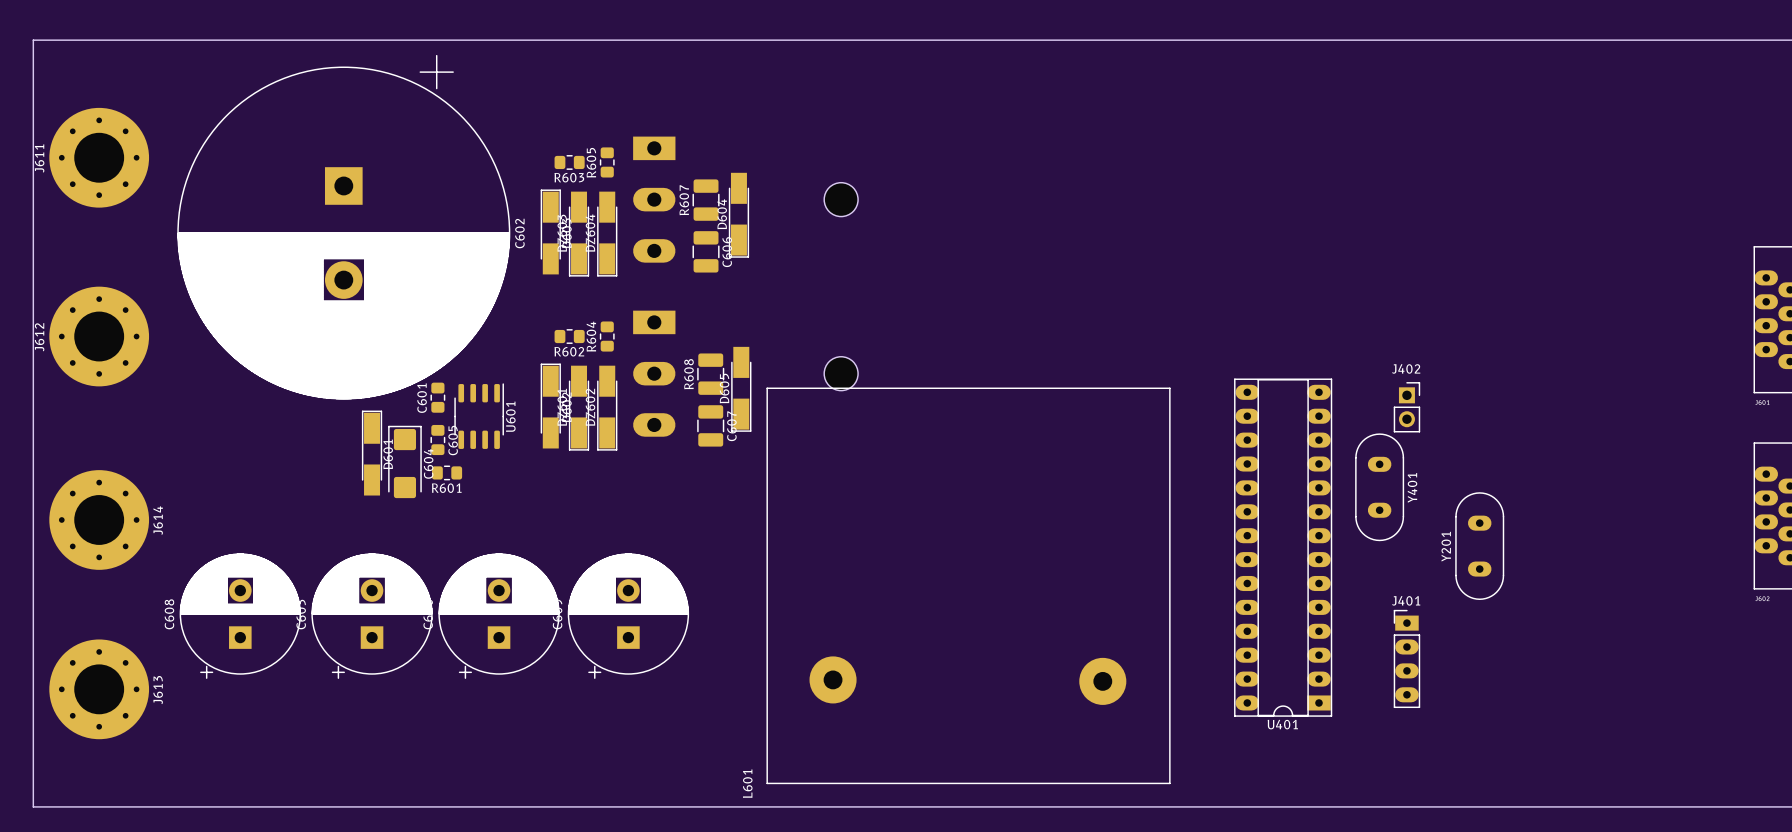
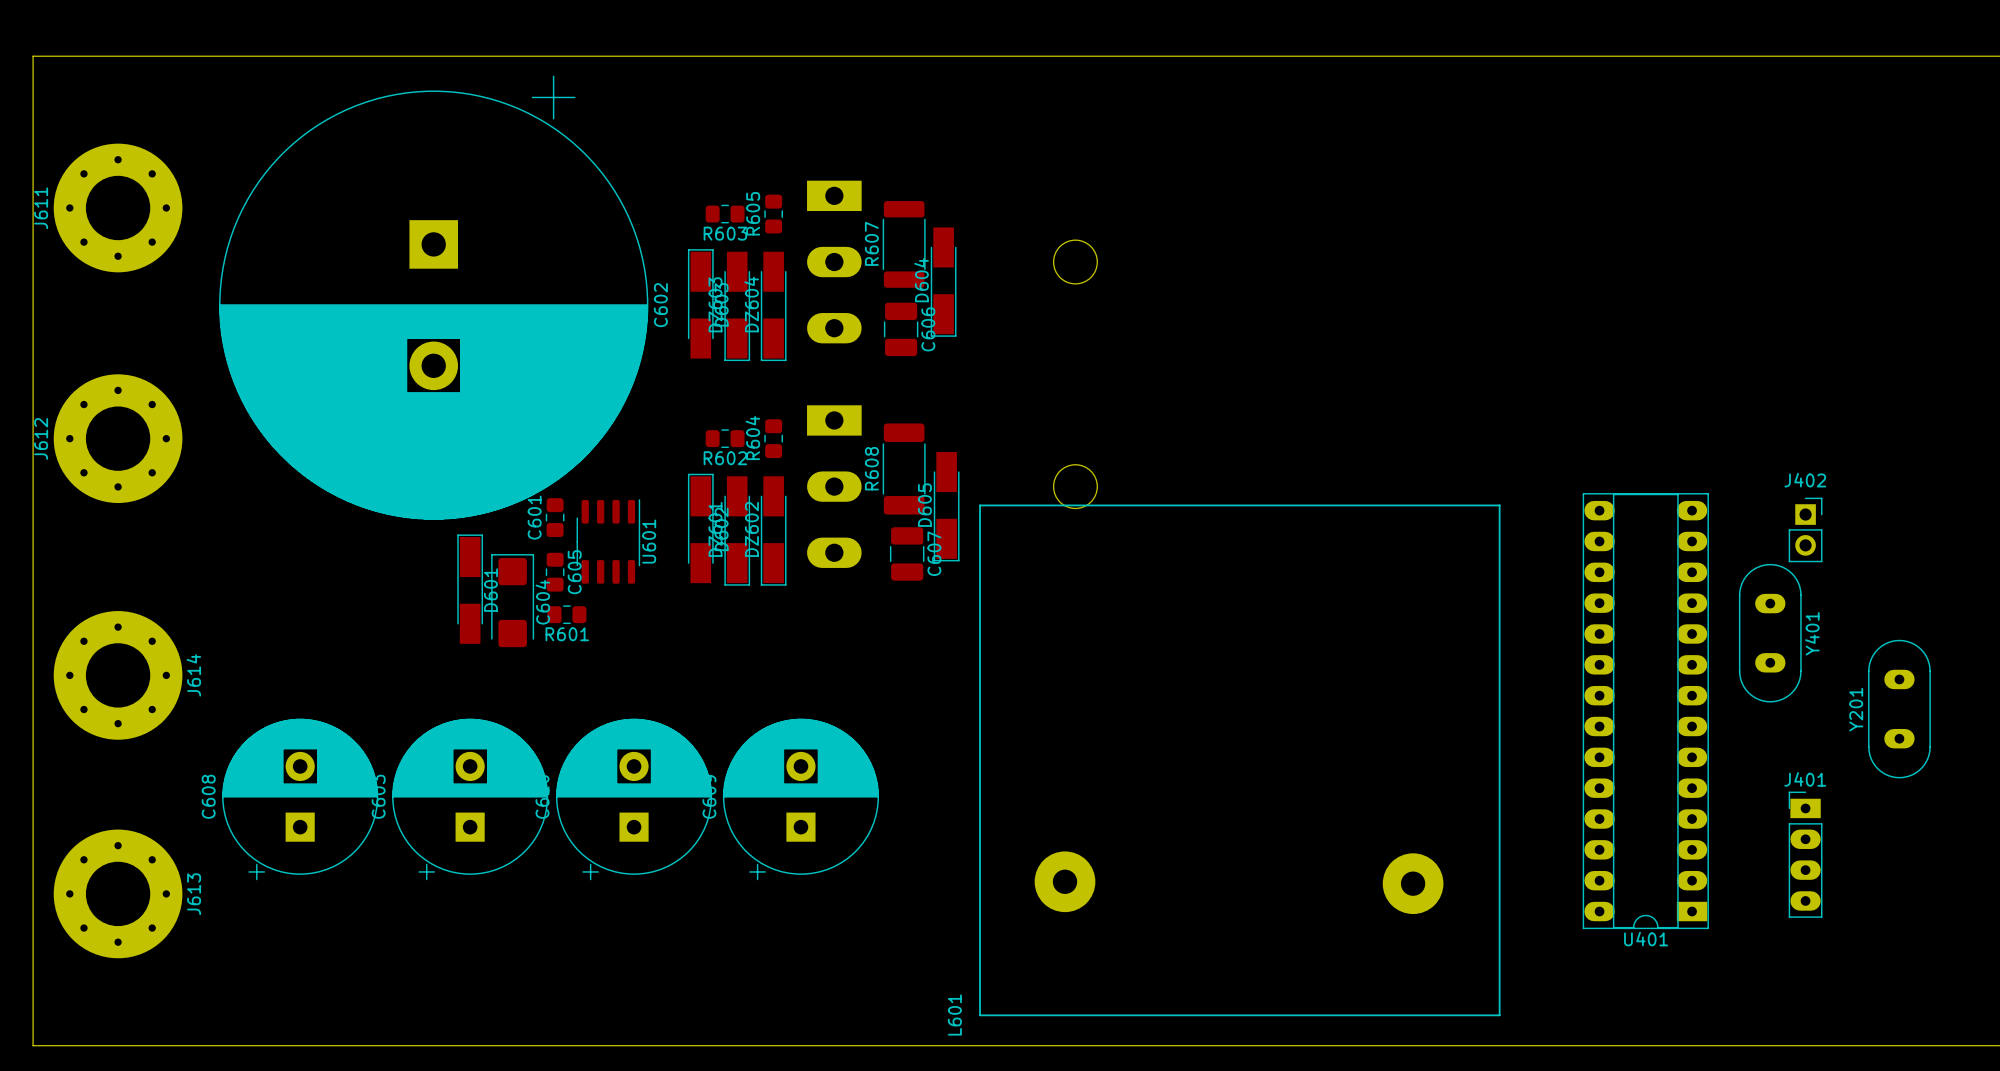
R607 footprint: [692, 179, 720, 221] -> [882, 201, 926, 288]
R608 footprint: [697, 353, 725, 395] -> [882, 423, 926, 515]

